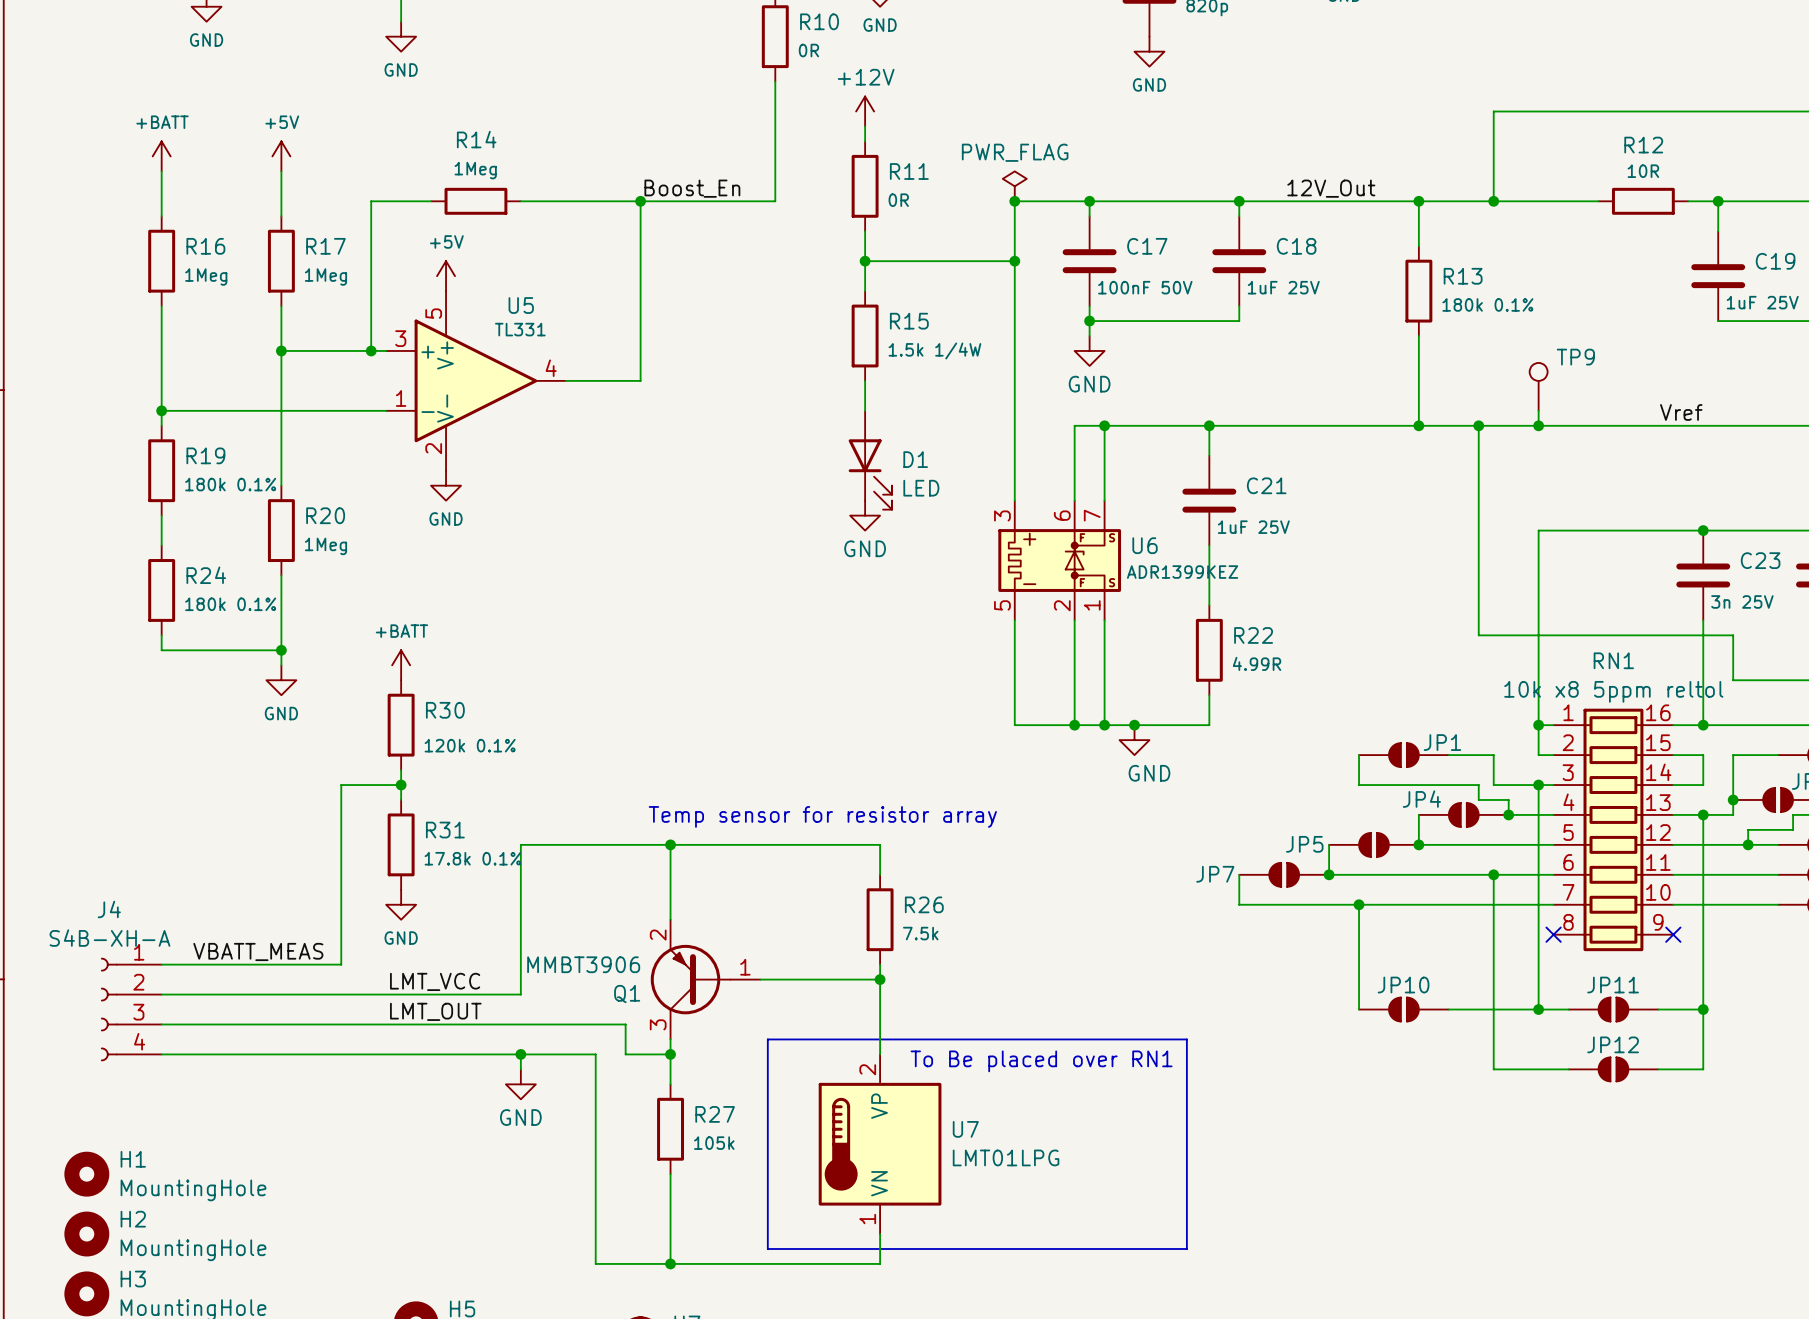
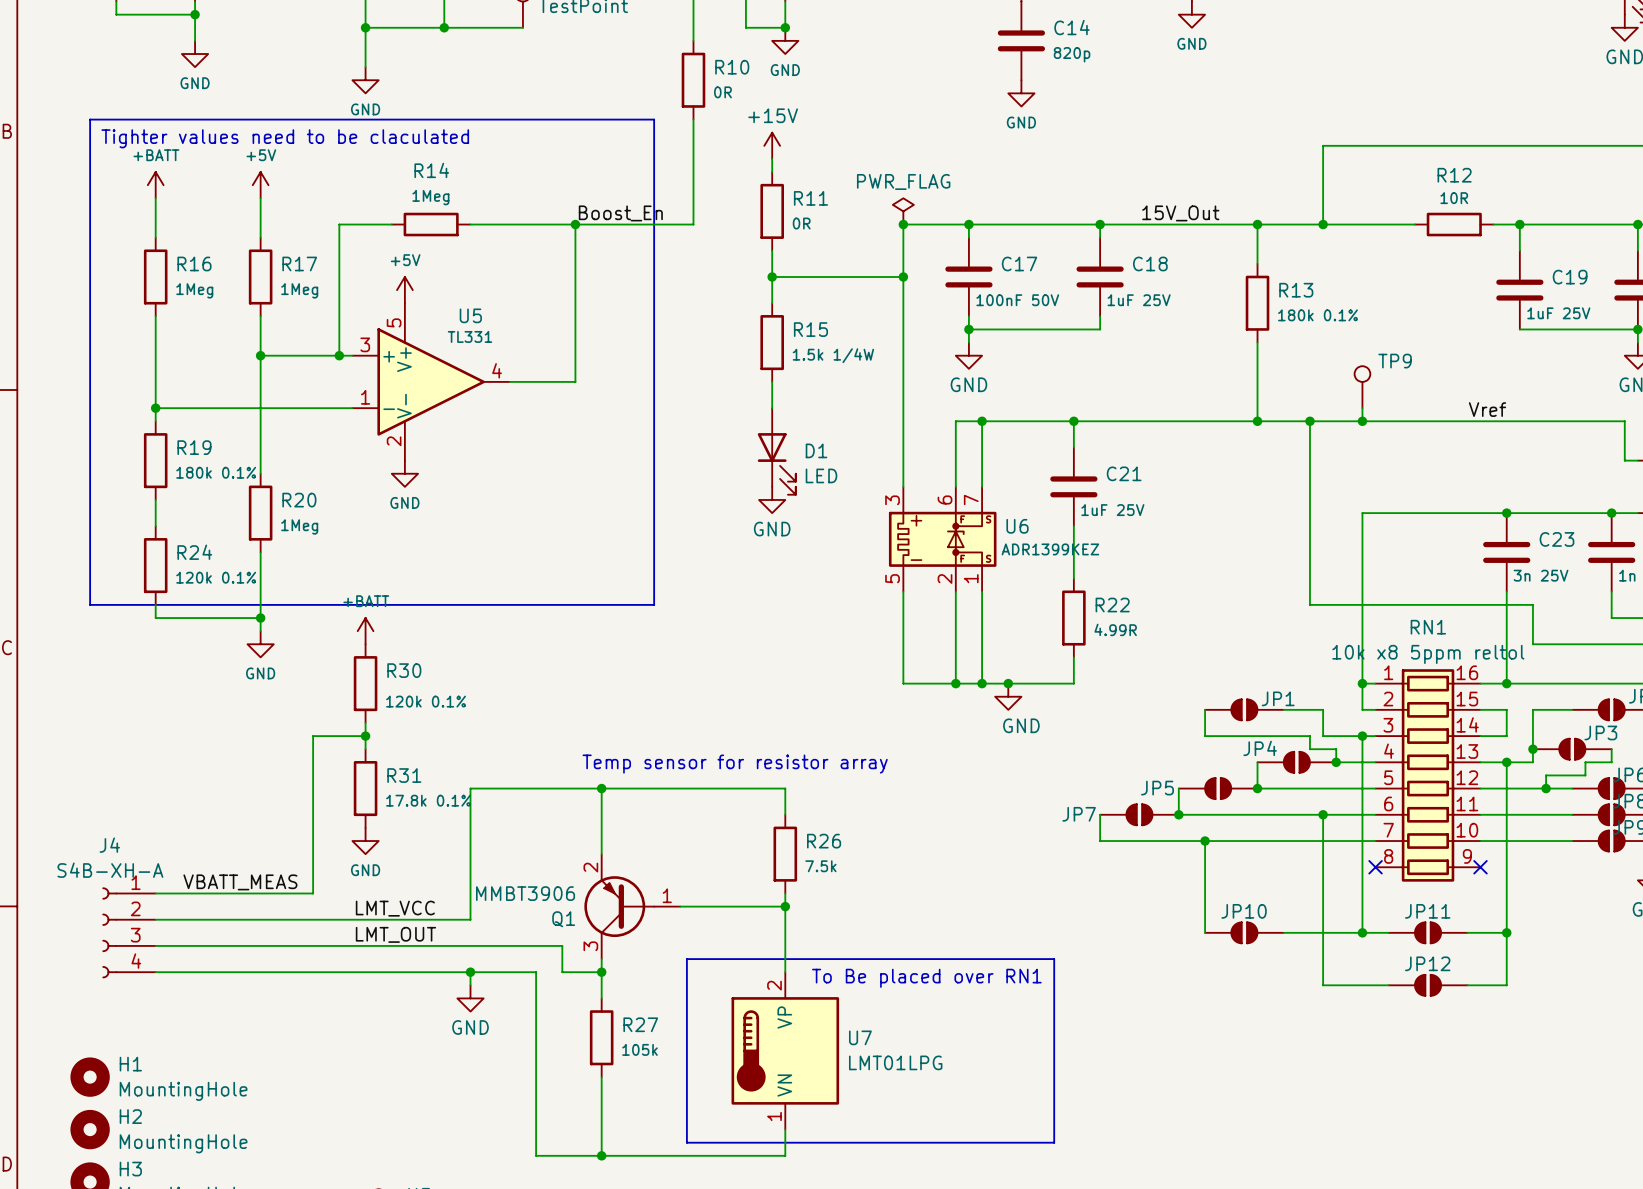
line: none -> (90, 119) (654, 119) (654, 604) (90, 604) (90, 119)
text: none -> Tighter values need to be claculated (285, 138)
power symbol: +12V (865, 111) -> +15V (772, 145)
label: 12V_Out (1331, 188) -> 15V_Out (1180, 213)
R24 value: 180k 0.1% (230, 604) -> 120k 0.1% (216, 577)

